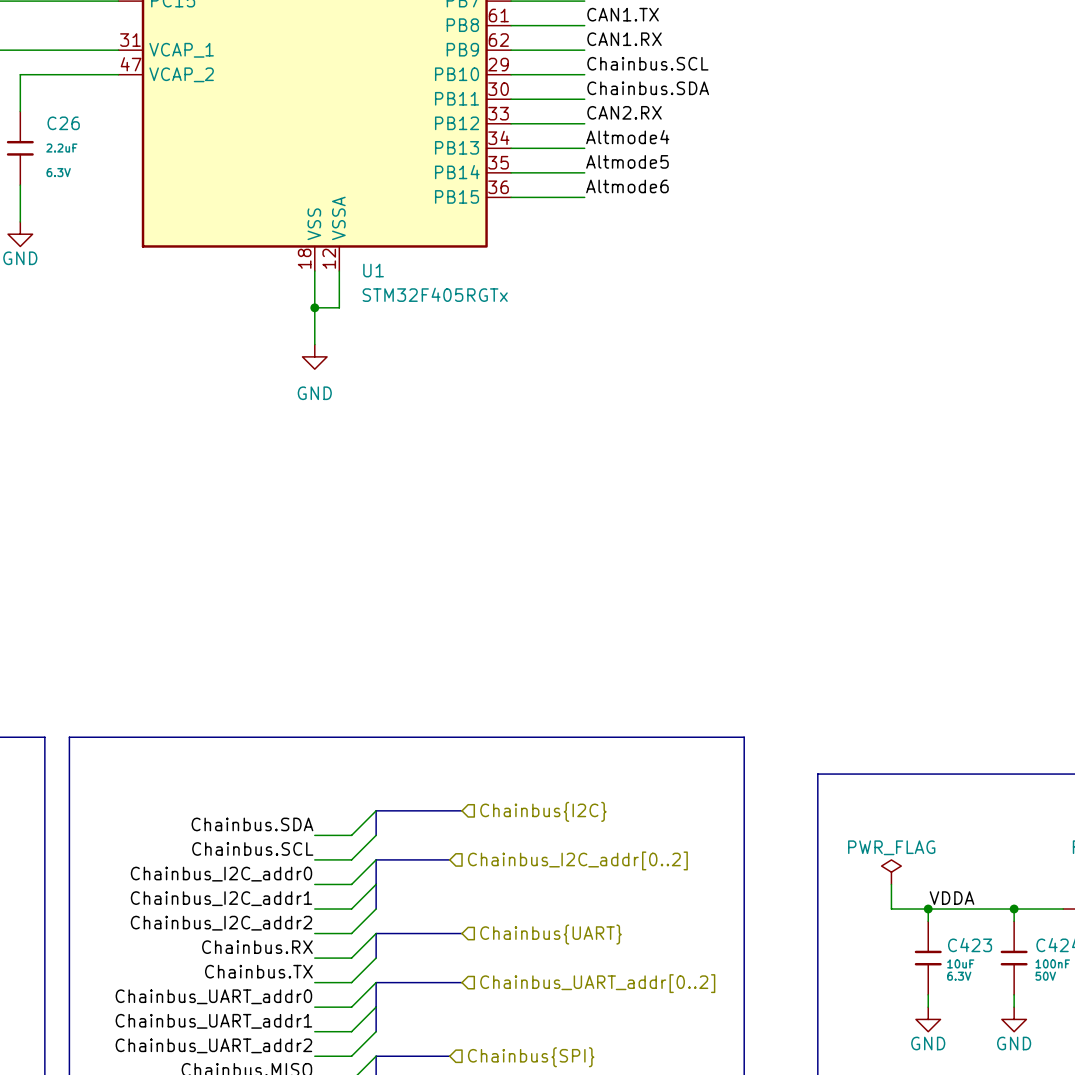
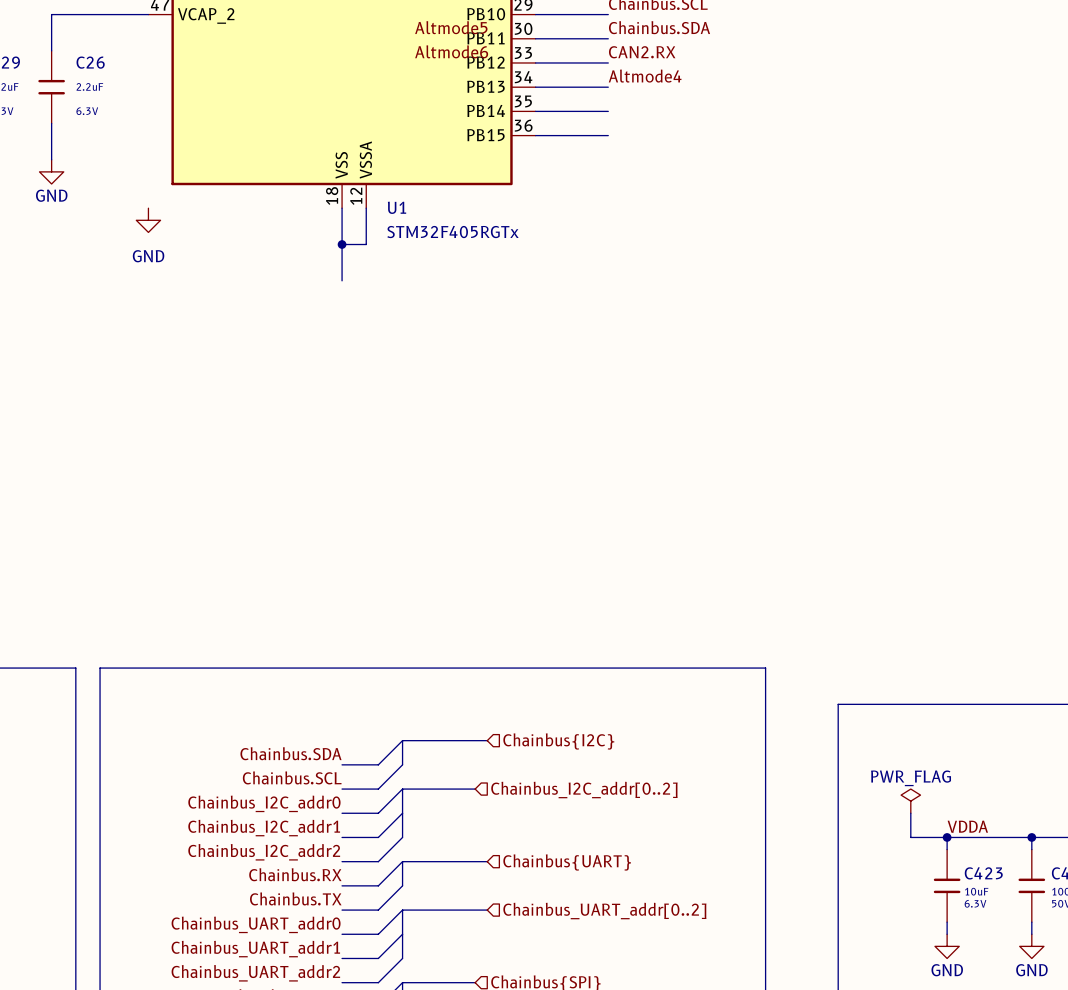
label position: Altmode5 (627, 161) -> Altmode5 (451, 27)
label position: Altmode6 (627, 186) -> Altmode6 (451, 51)
power symbol position: GND (314, 356) -> GND (148, 220)

